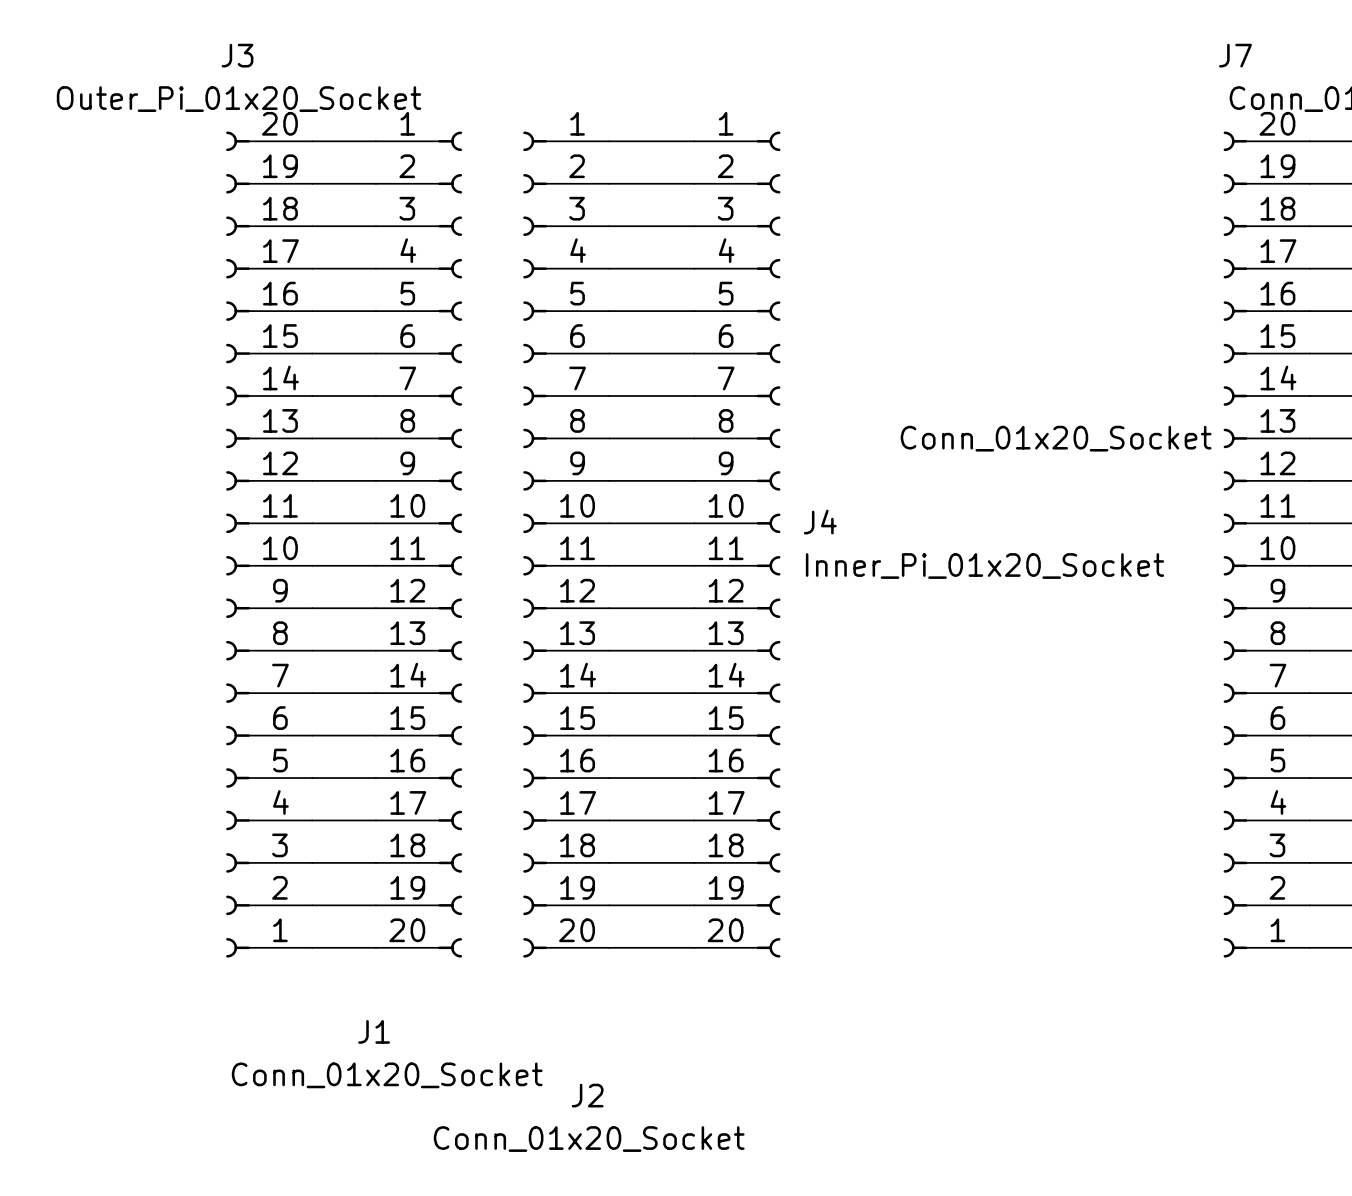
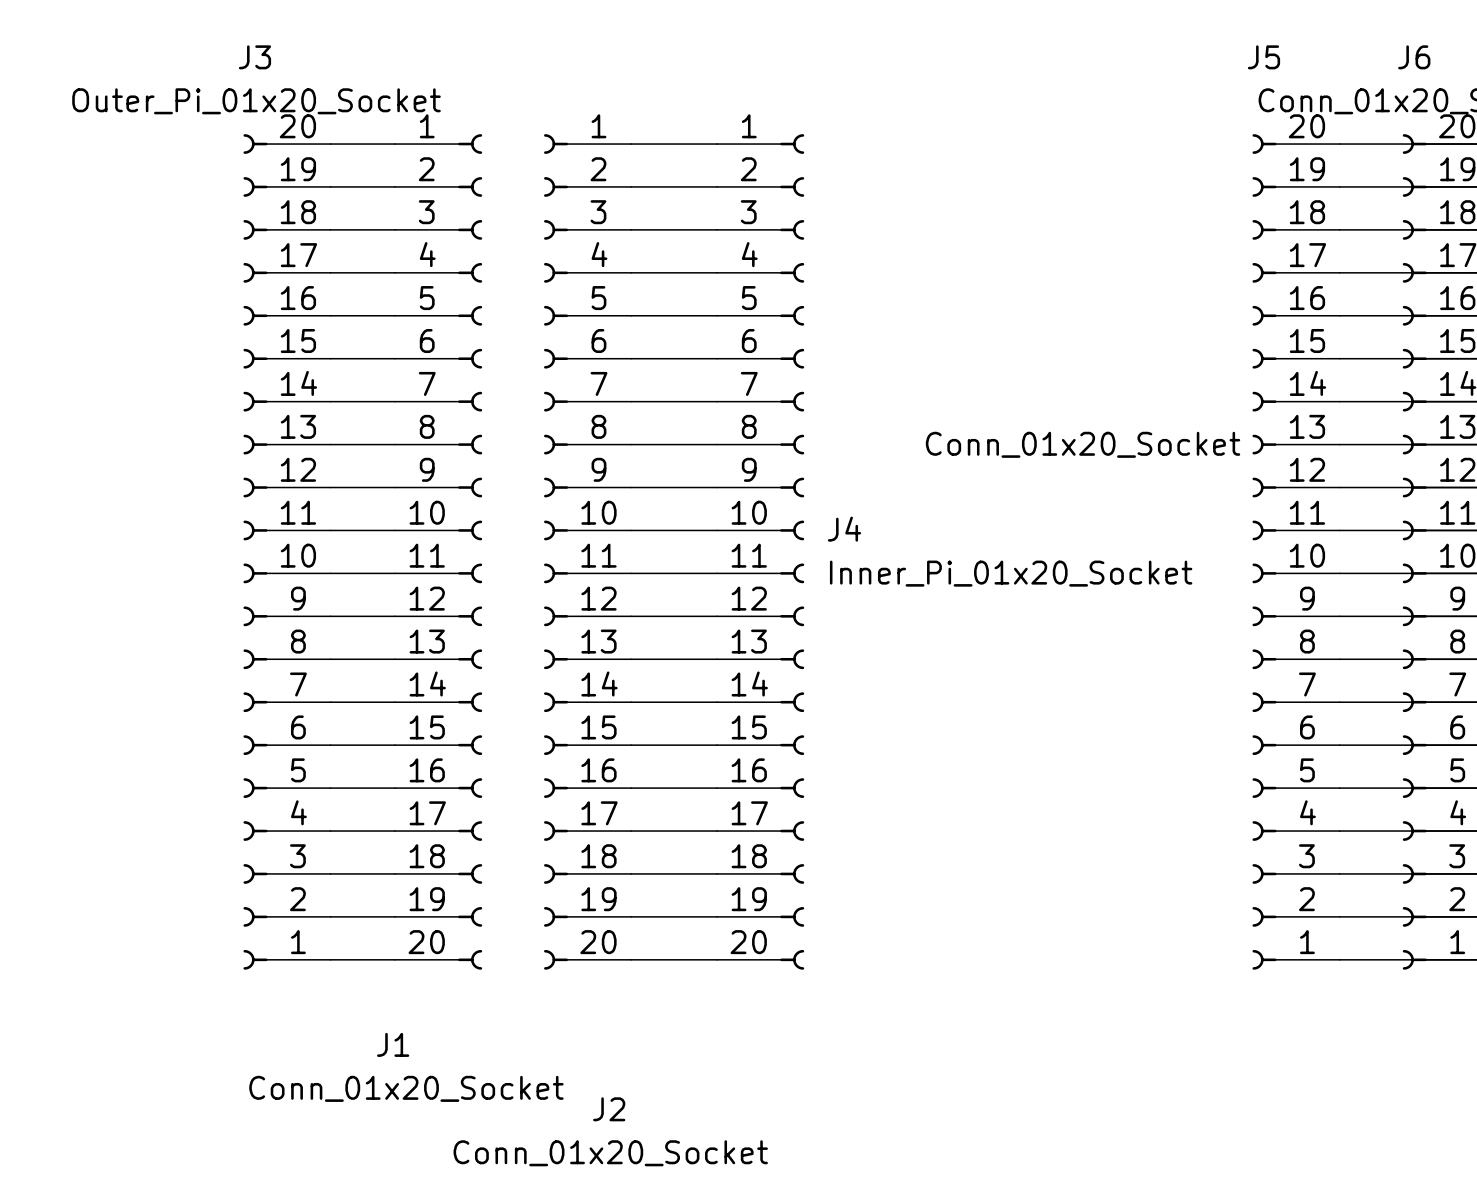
J7 name: J7 (1235, 55) -> J5 (1263, 57)

